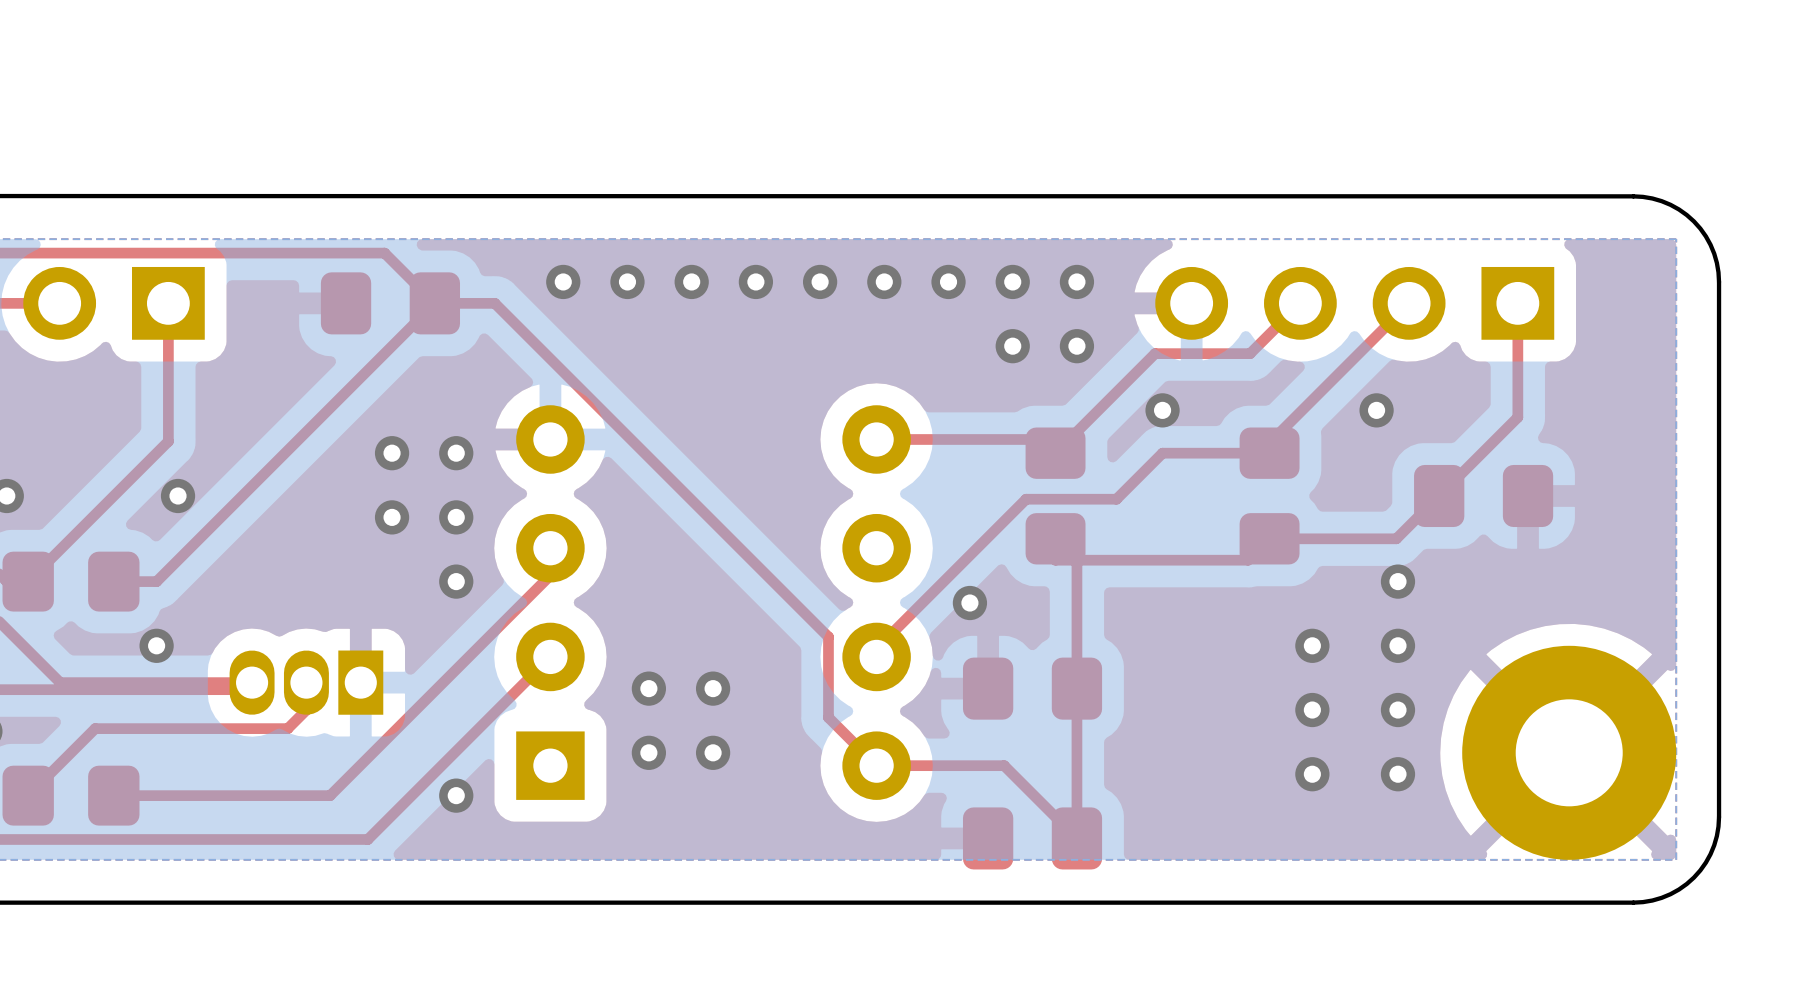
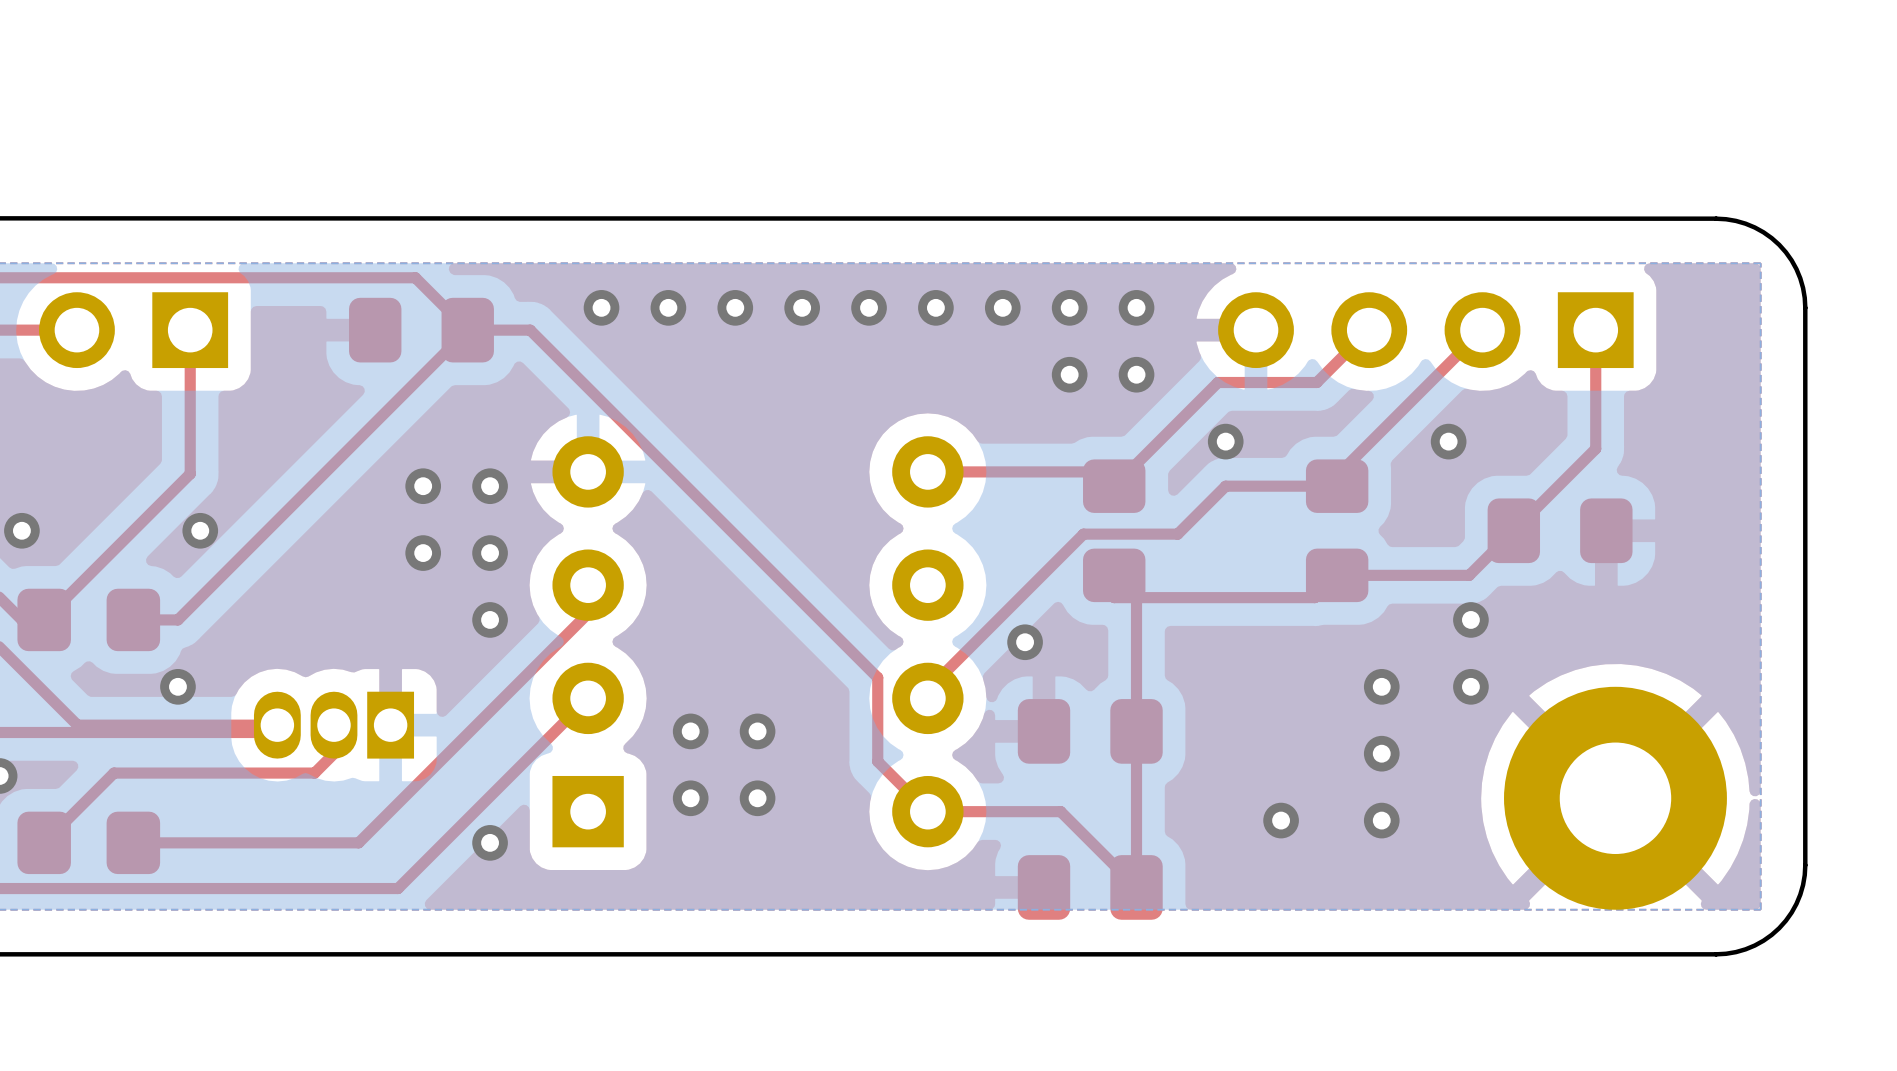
via: (1397, 710) -> none
part position: (1569, 752) -> (1615, 798)
via: none -> (1281, 820)
via: (1397, 774) -> none

